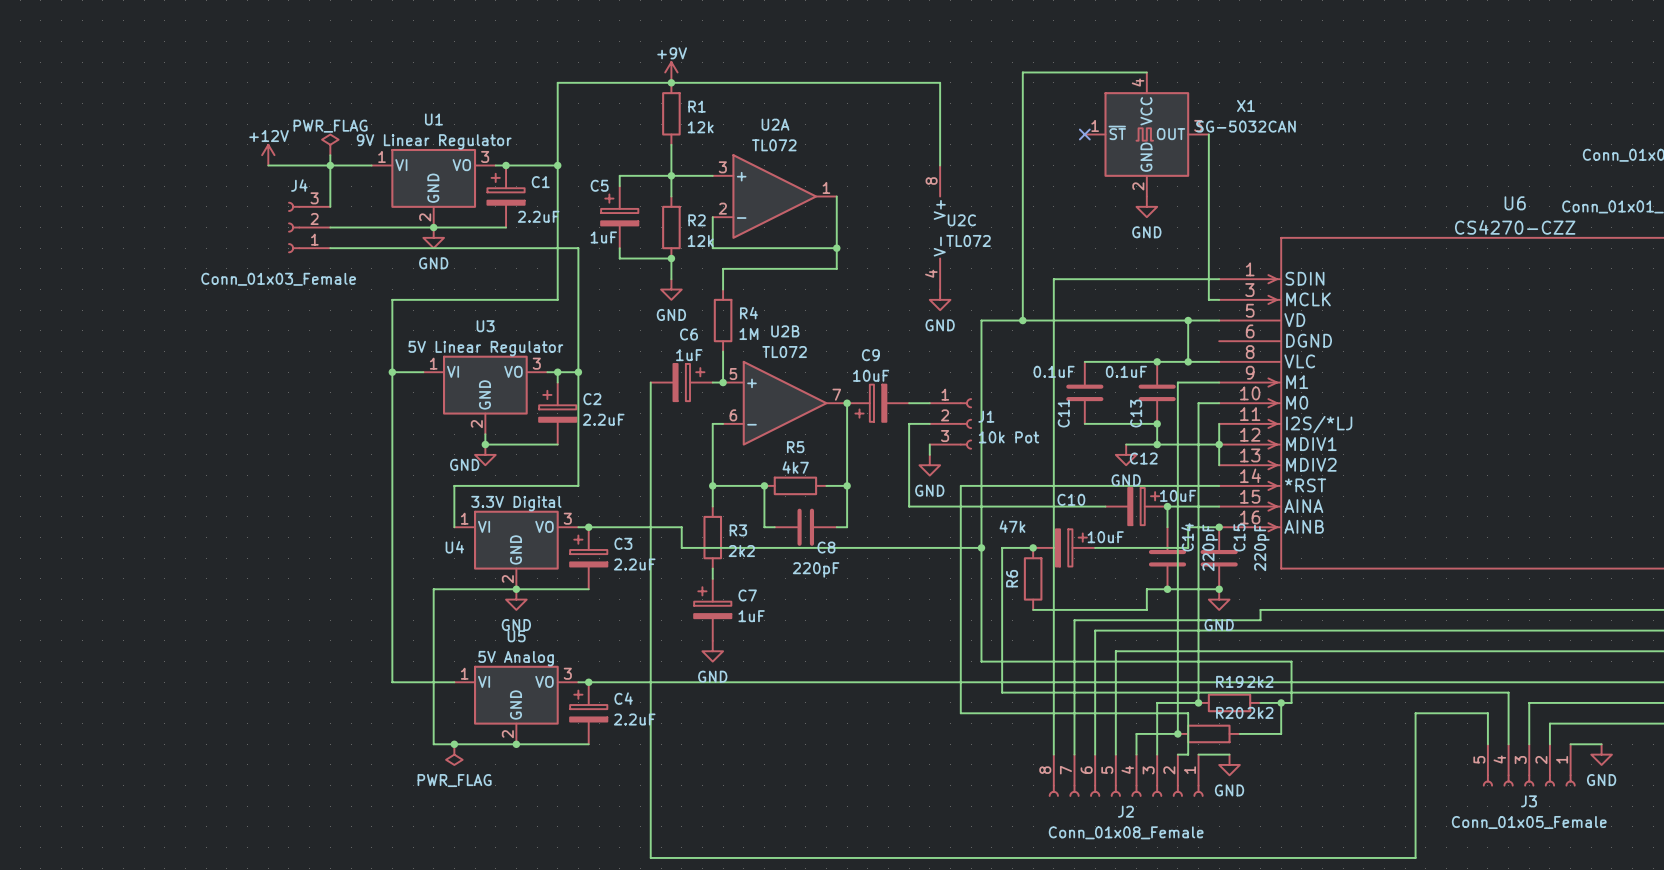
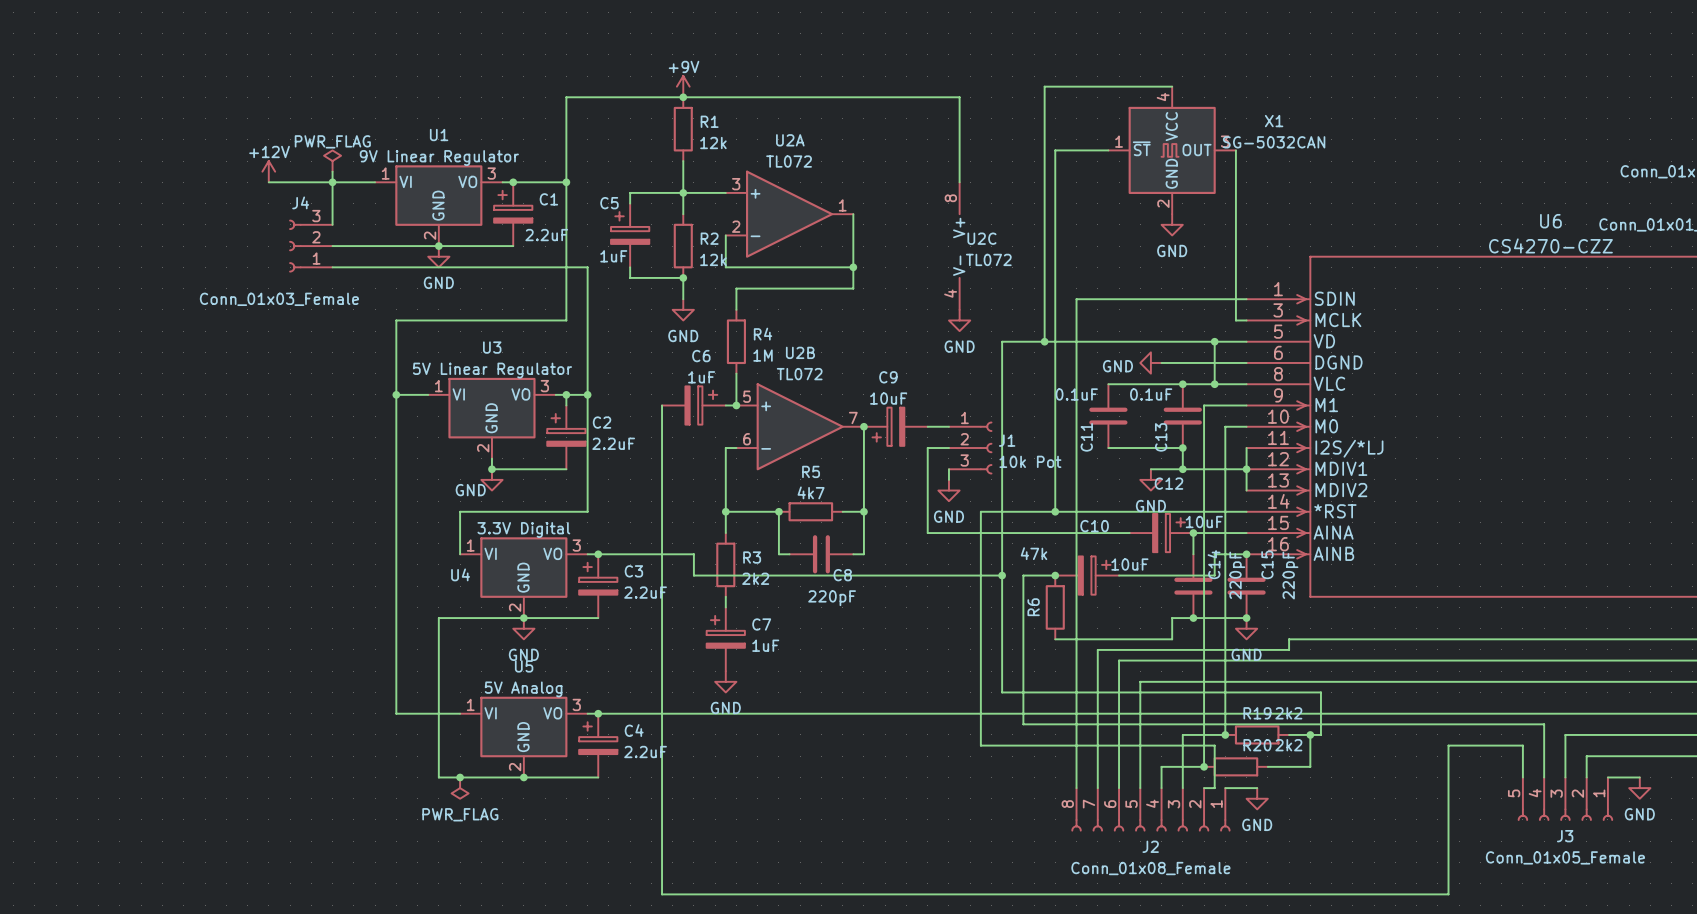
wire: none -> (1108, 150) (1055, 150) (1055, 511)
no-connect mark: (1084, 134) -> none
power symbol: none -> GND (1150, 362)
wire: none -> (1161, 362) (1246, 362)
junction: none -> (1055, 511)

